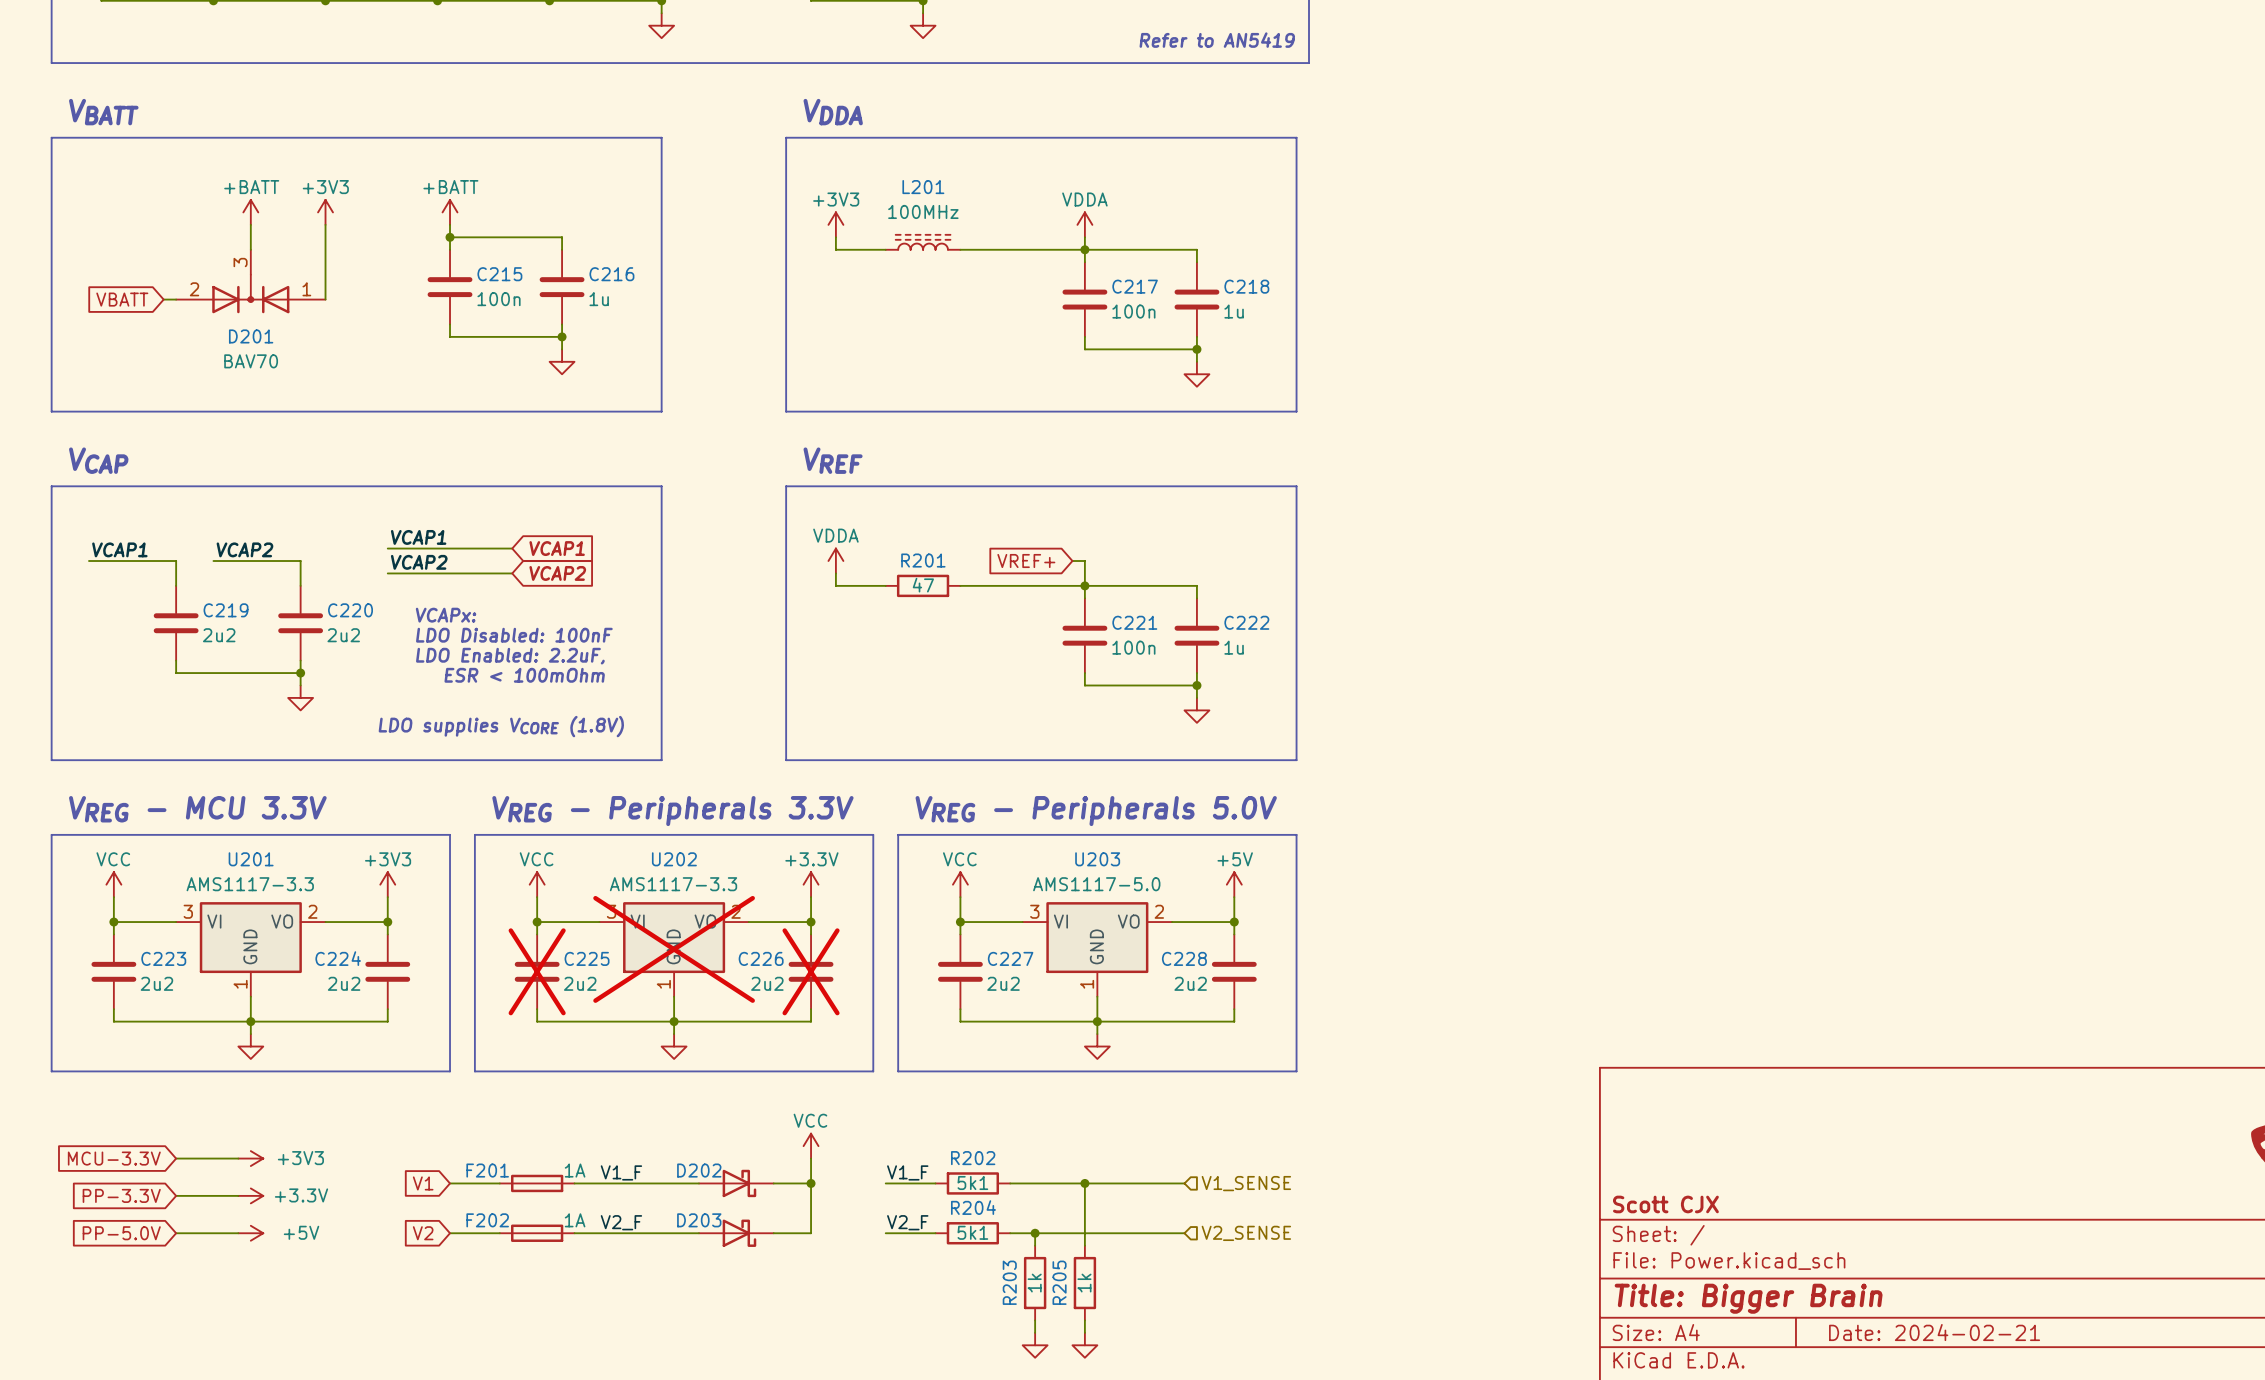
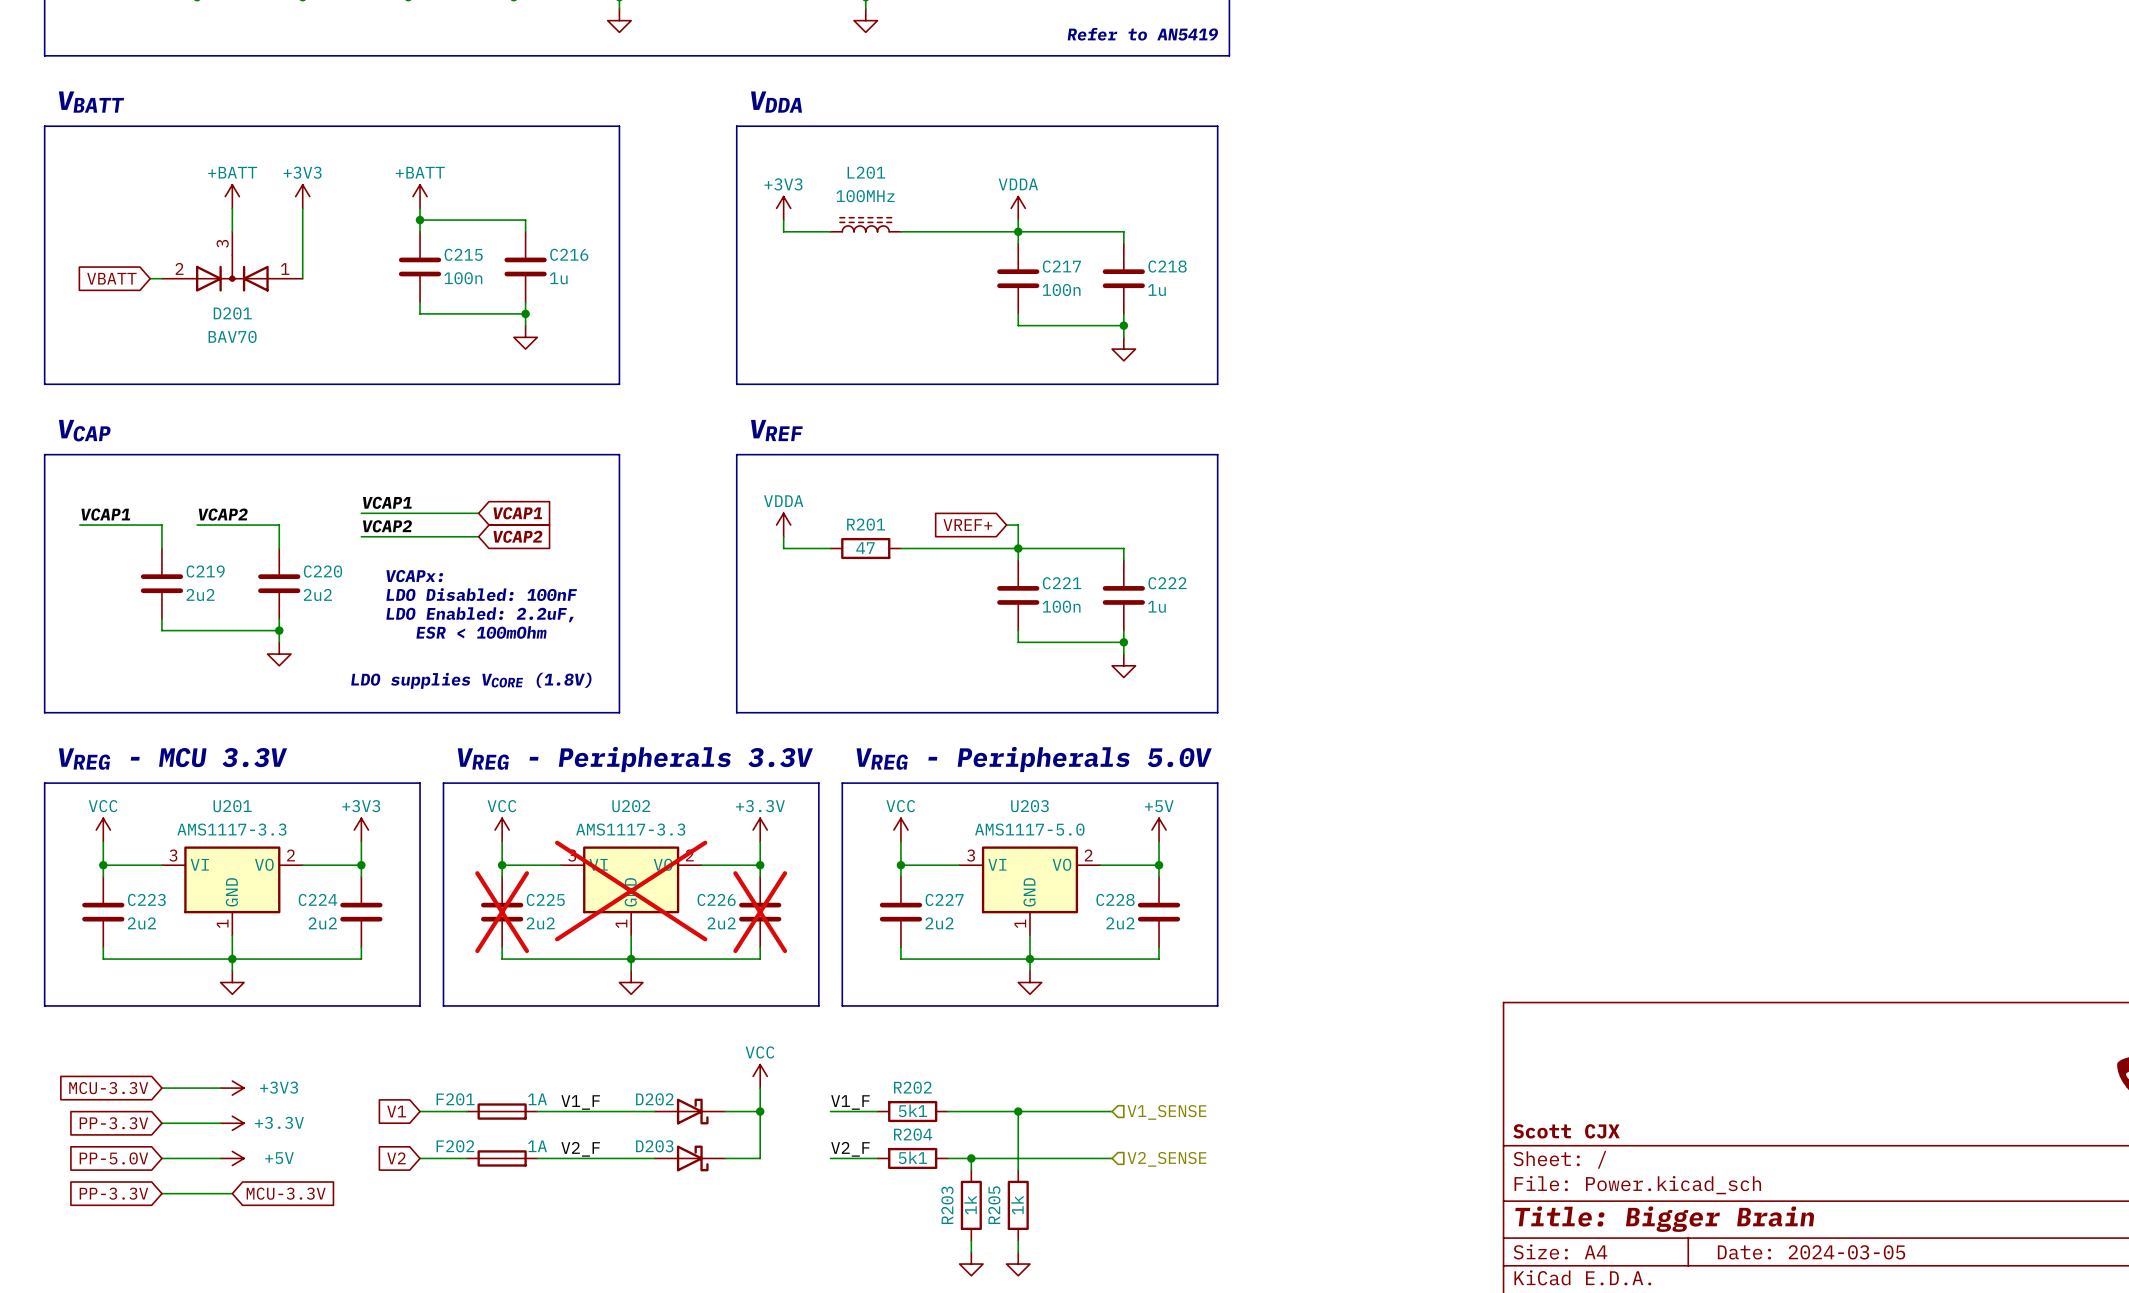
global label: none -> PP-3.3V (113, 1193)
wire: none -> (161, 1193) (232, 1193)
global label: none -> MCU-3.3V (286, 1193)
title block: Date: 2024-02-21 (1934, 1332) -> Date: 2024-03-05 (1811, 1252)

